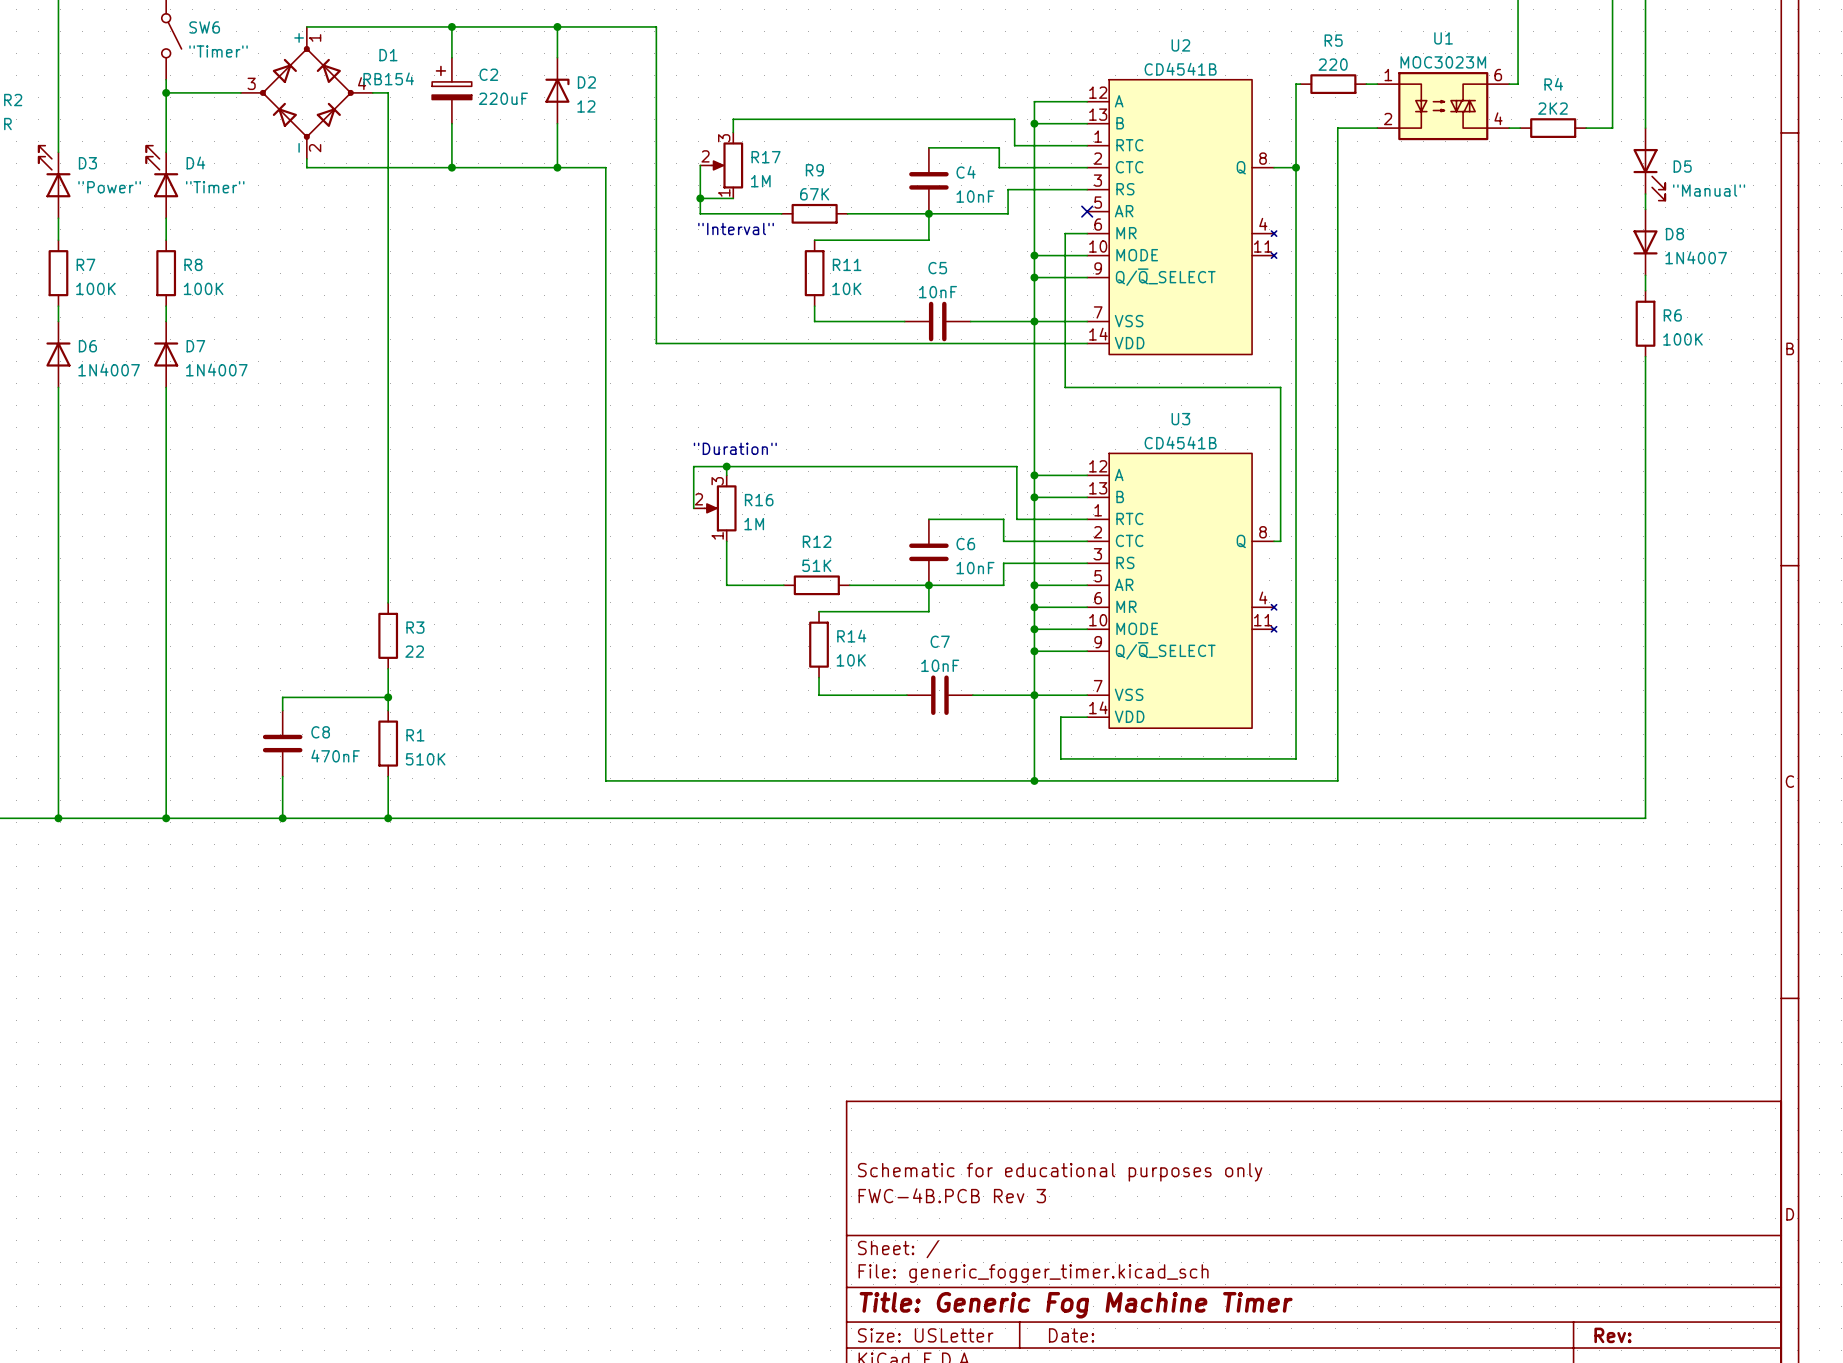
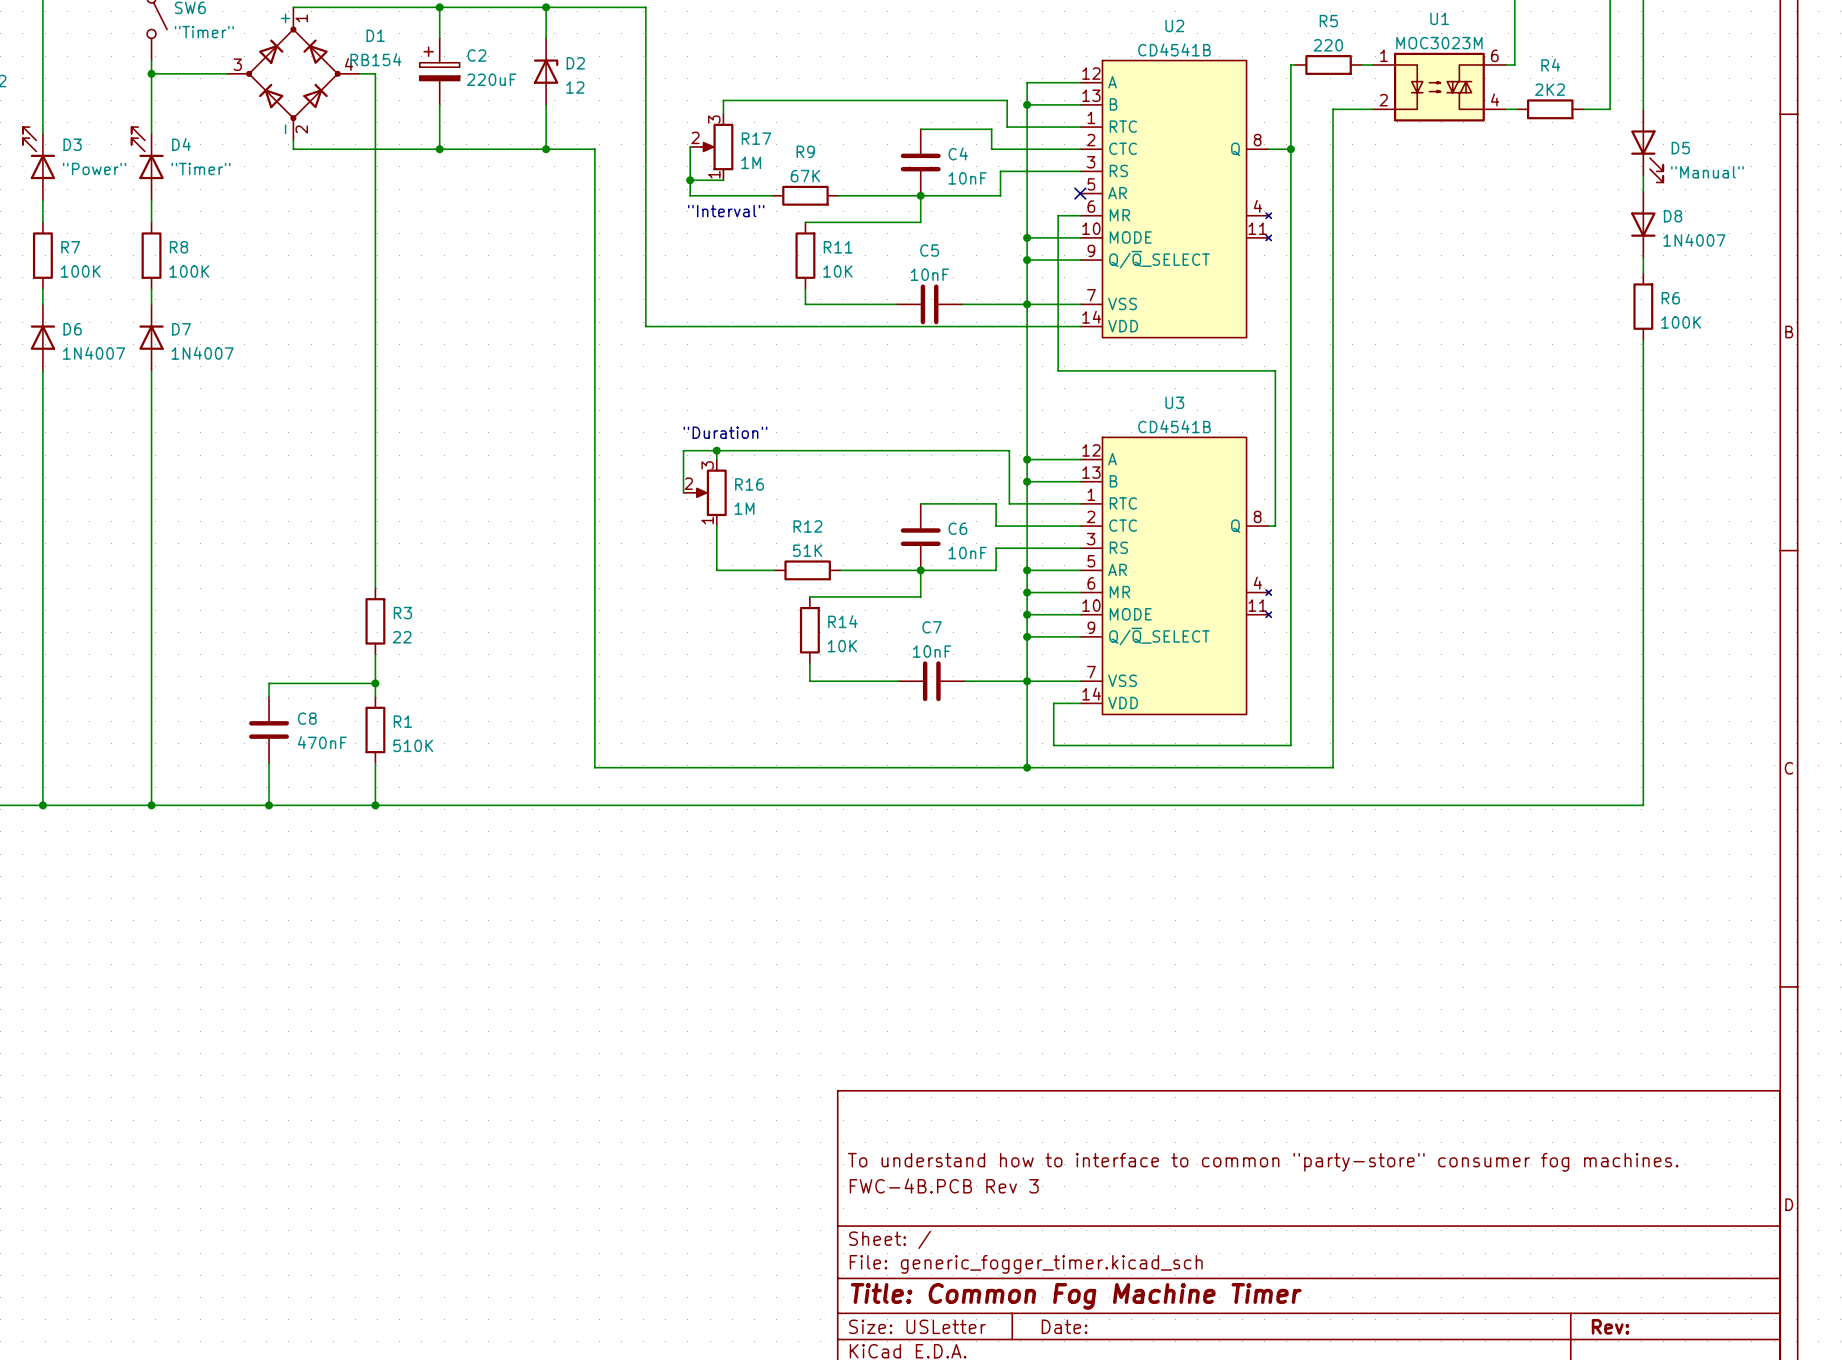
title block: Schematic for educational purposes only (1060, 1172) -> To understand how to interface to common "party-store" consumer fog machines. (1263, 1162)
title block: Title: Generic Fog Machine Timer (1076, 1305) -> Title: Common Fog Machine Timer (1076, 1296)

